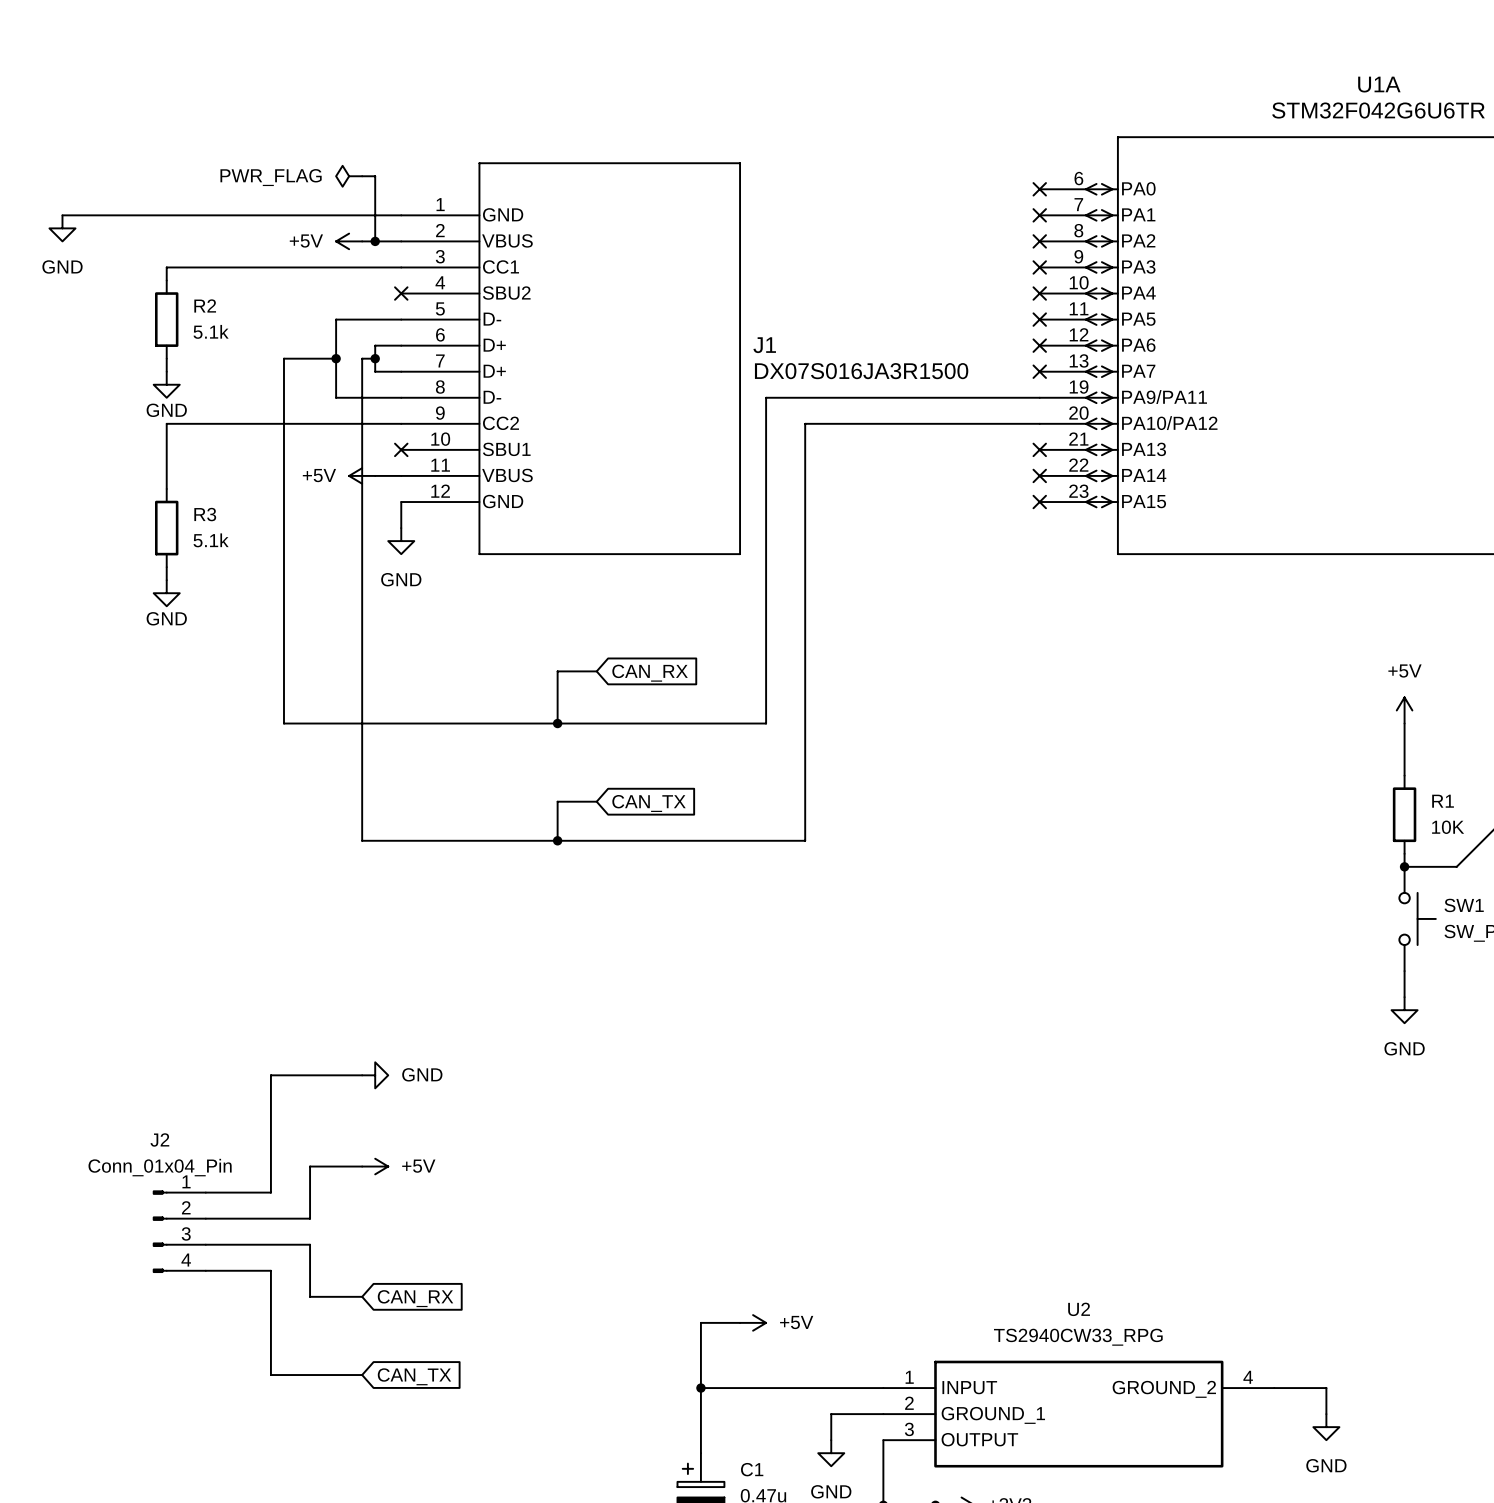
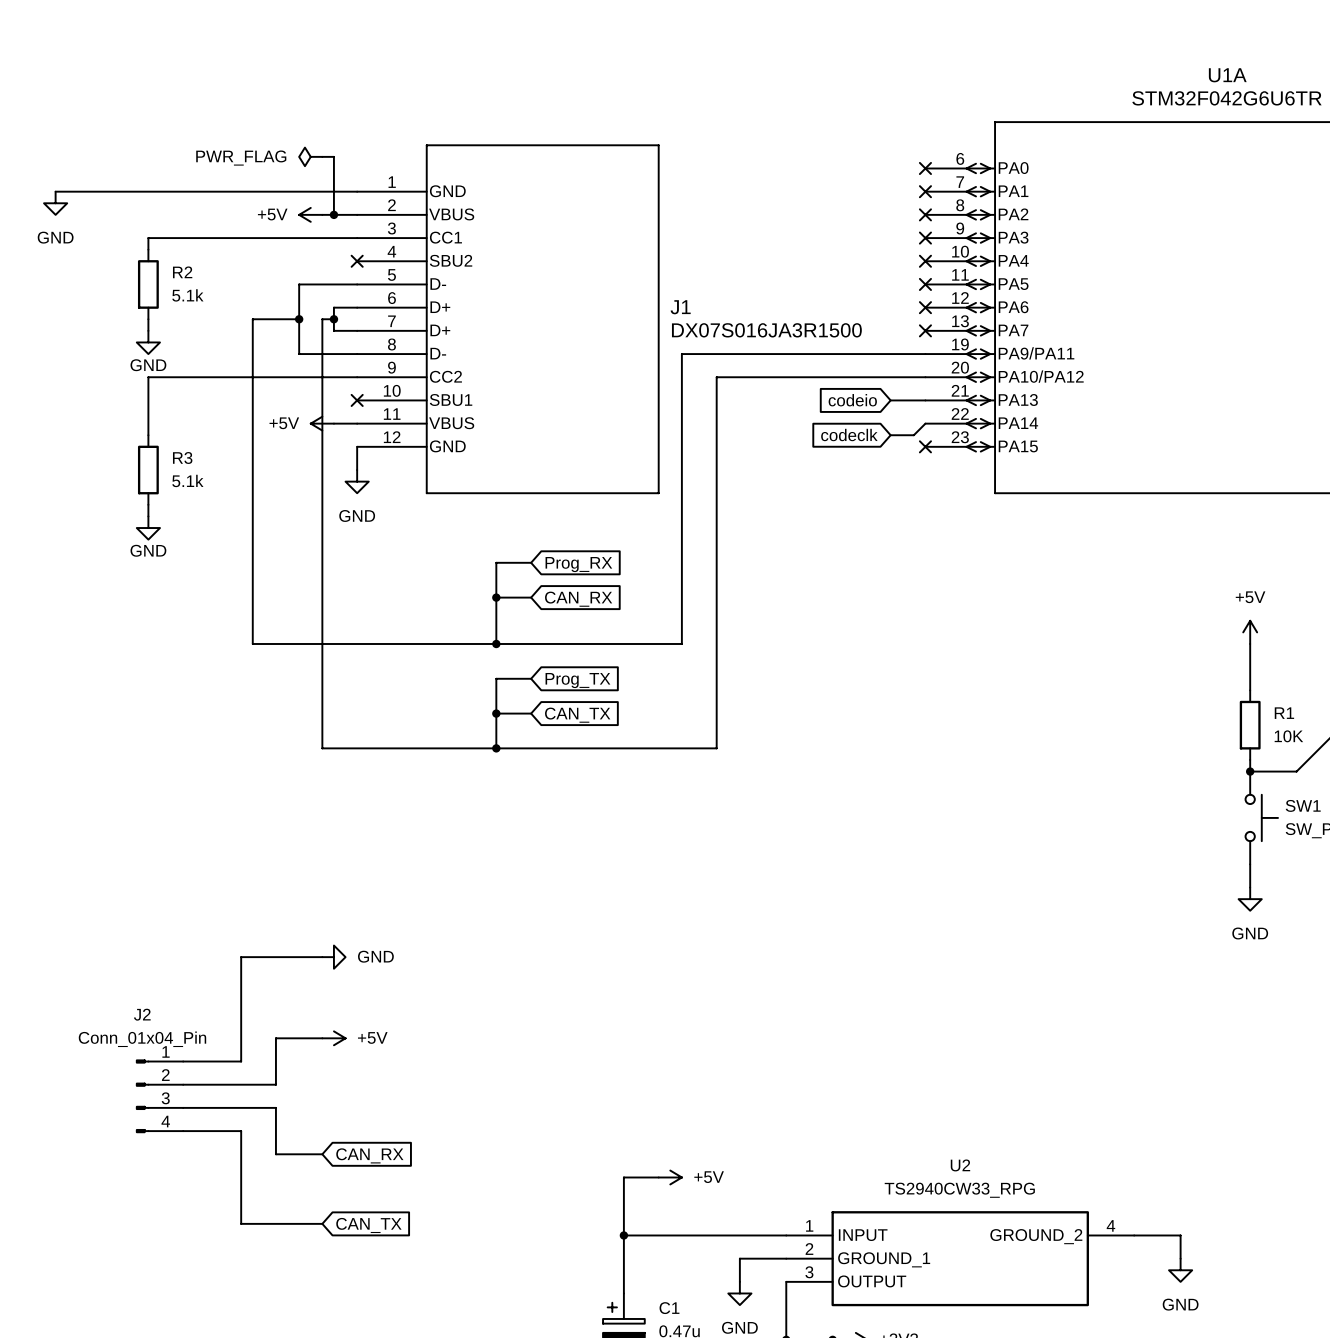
global label: none -> codeio (852, 400)
wire: none -> (890, 400) (925, 400)
no-connect mark: (1039, 449) -> none
wire: none -> (925, 423) (913, 435) (890, 435)
no-connect mark: (1039, 475) -> none
global label: none -> codeclk (849, 435)
wire: none -> (531, 562) (496, 562) (496, 597)
global label: none -> Prog_RX (578, 564)
junction: none -> (496, 597)
wire: none -> (531, 678) (496, 678) (496, 713)
global label: none -> Prog_TX (577, 680)
junction: none -> (496, 713)

